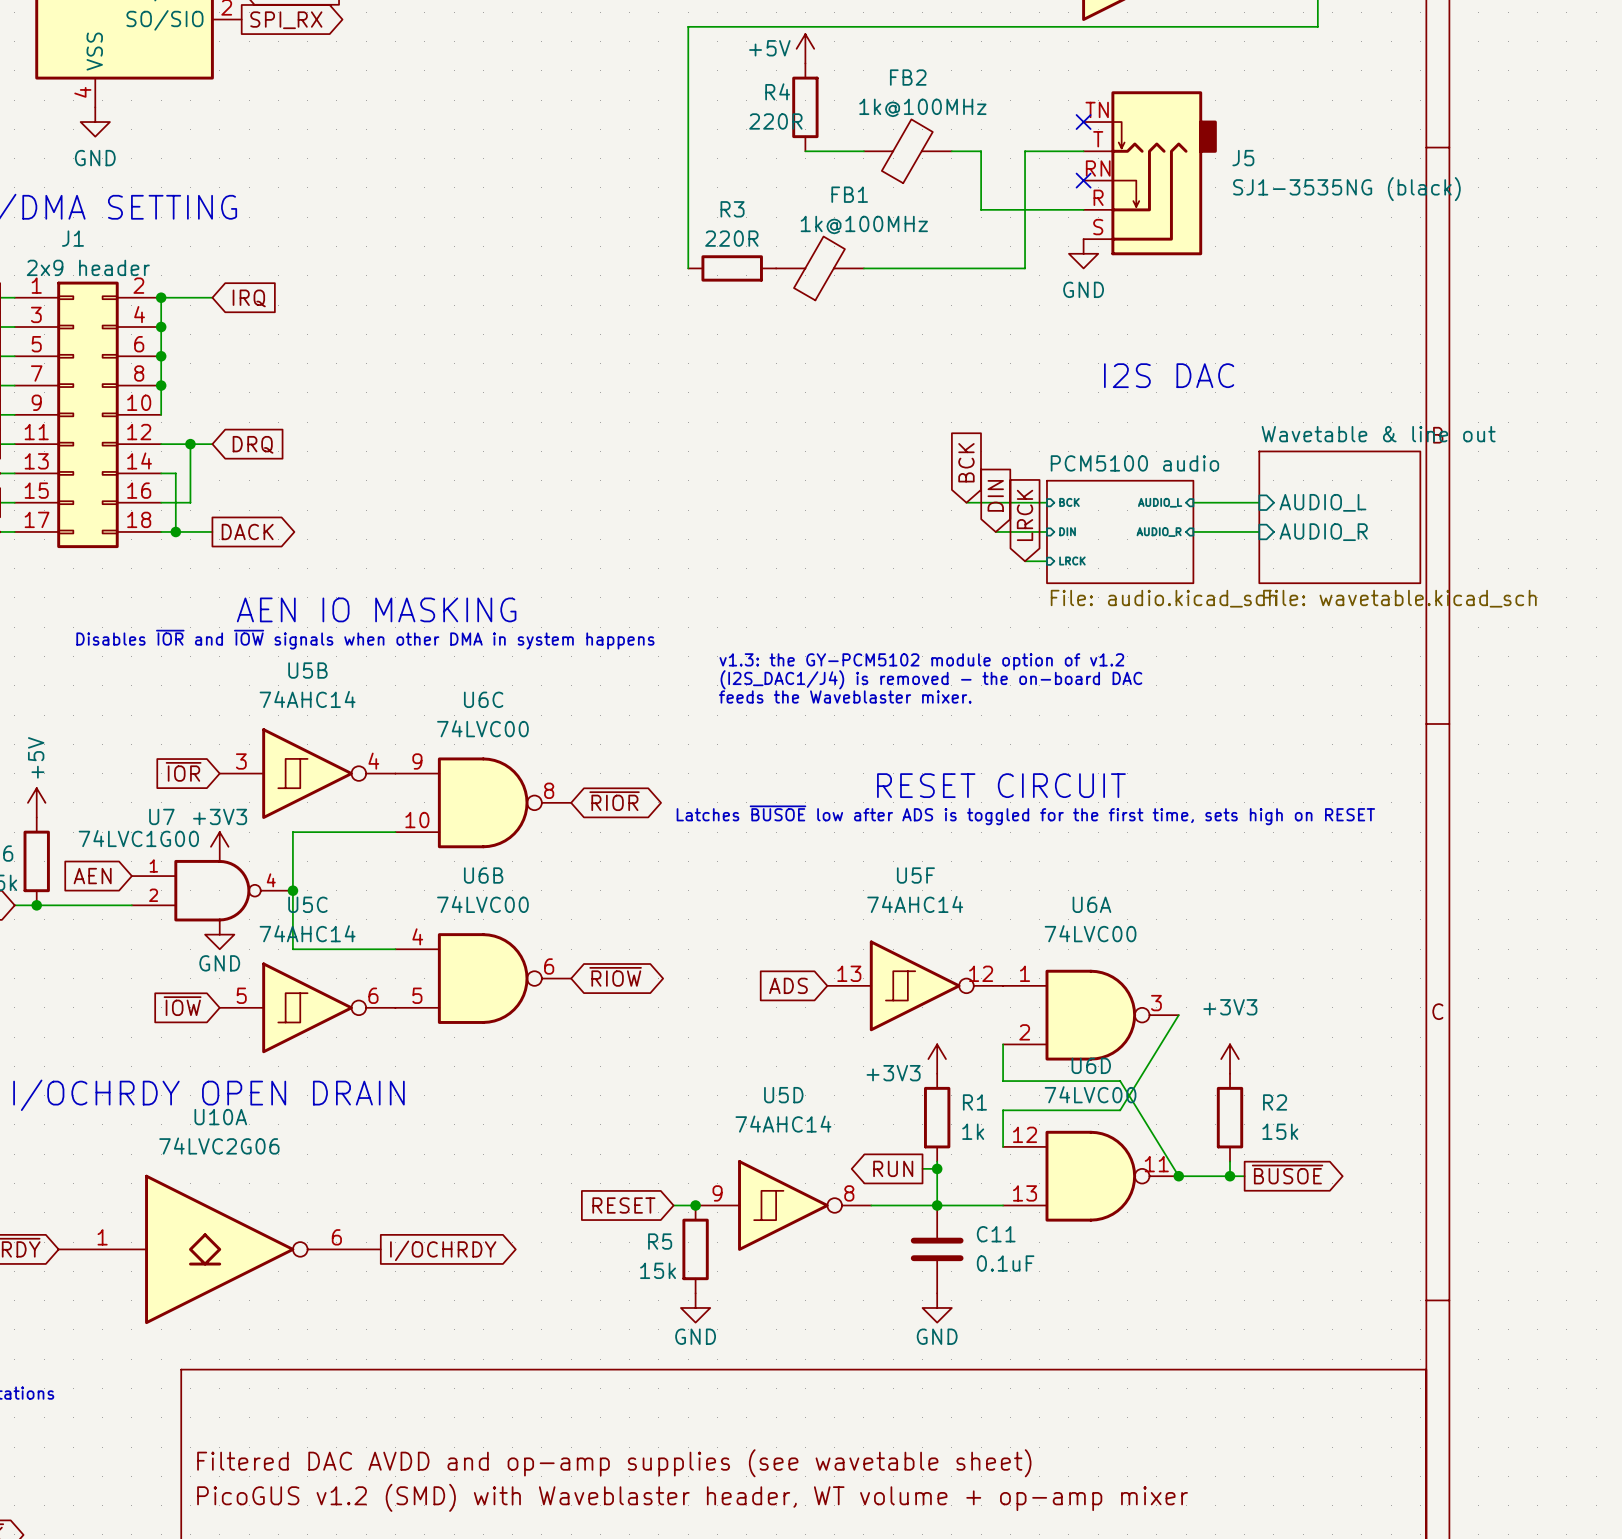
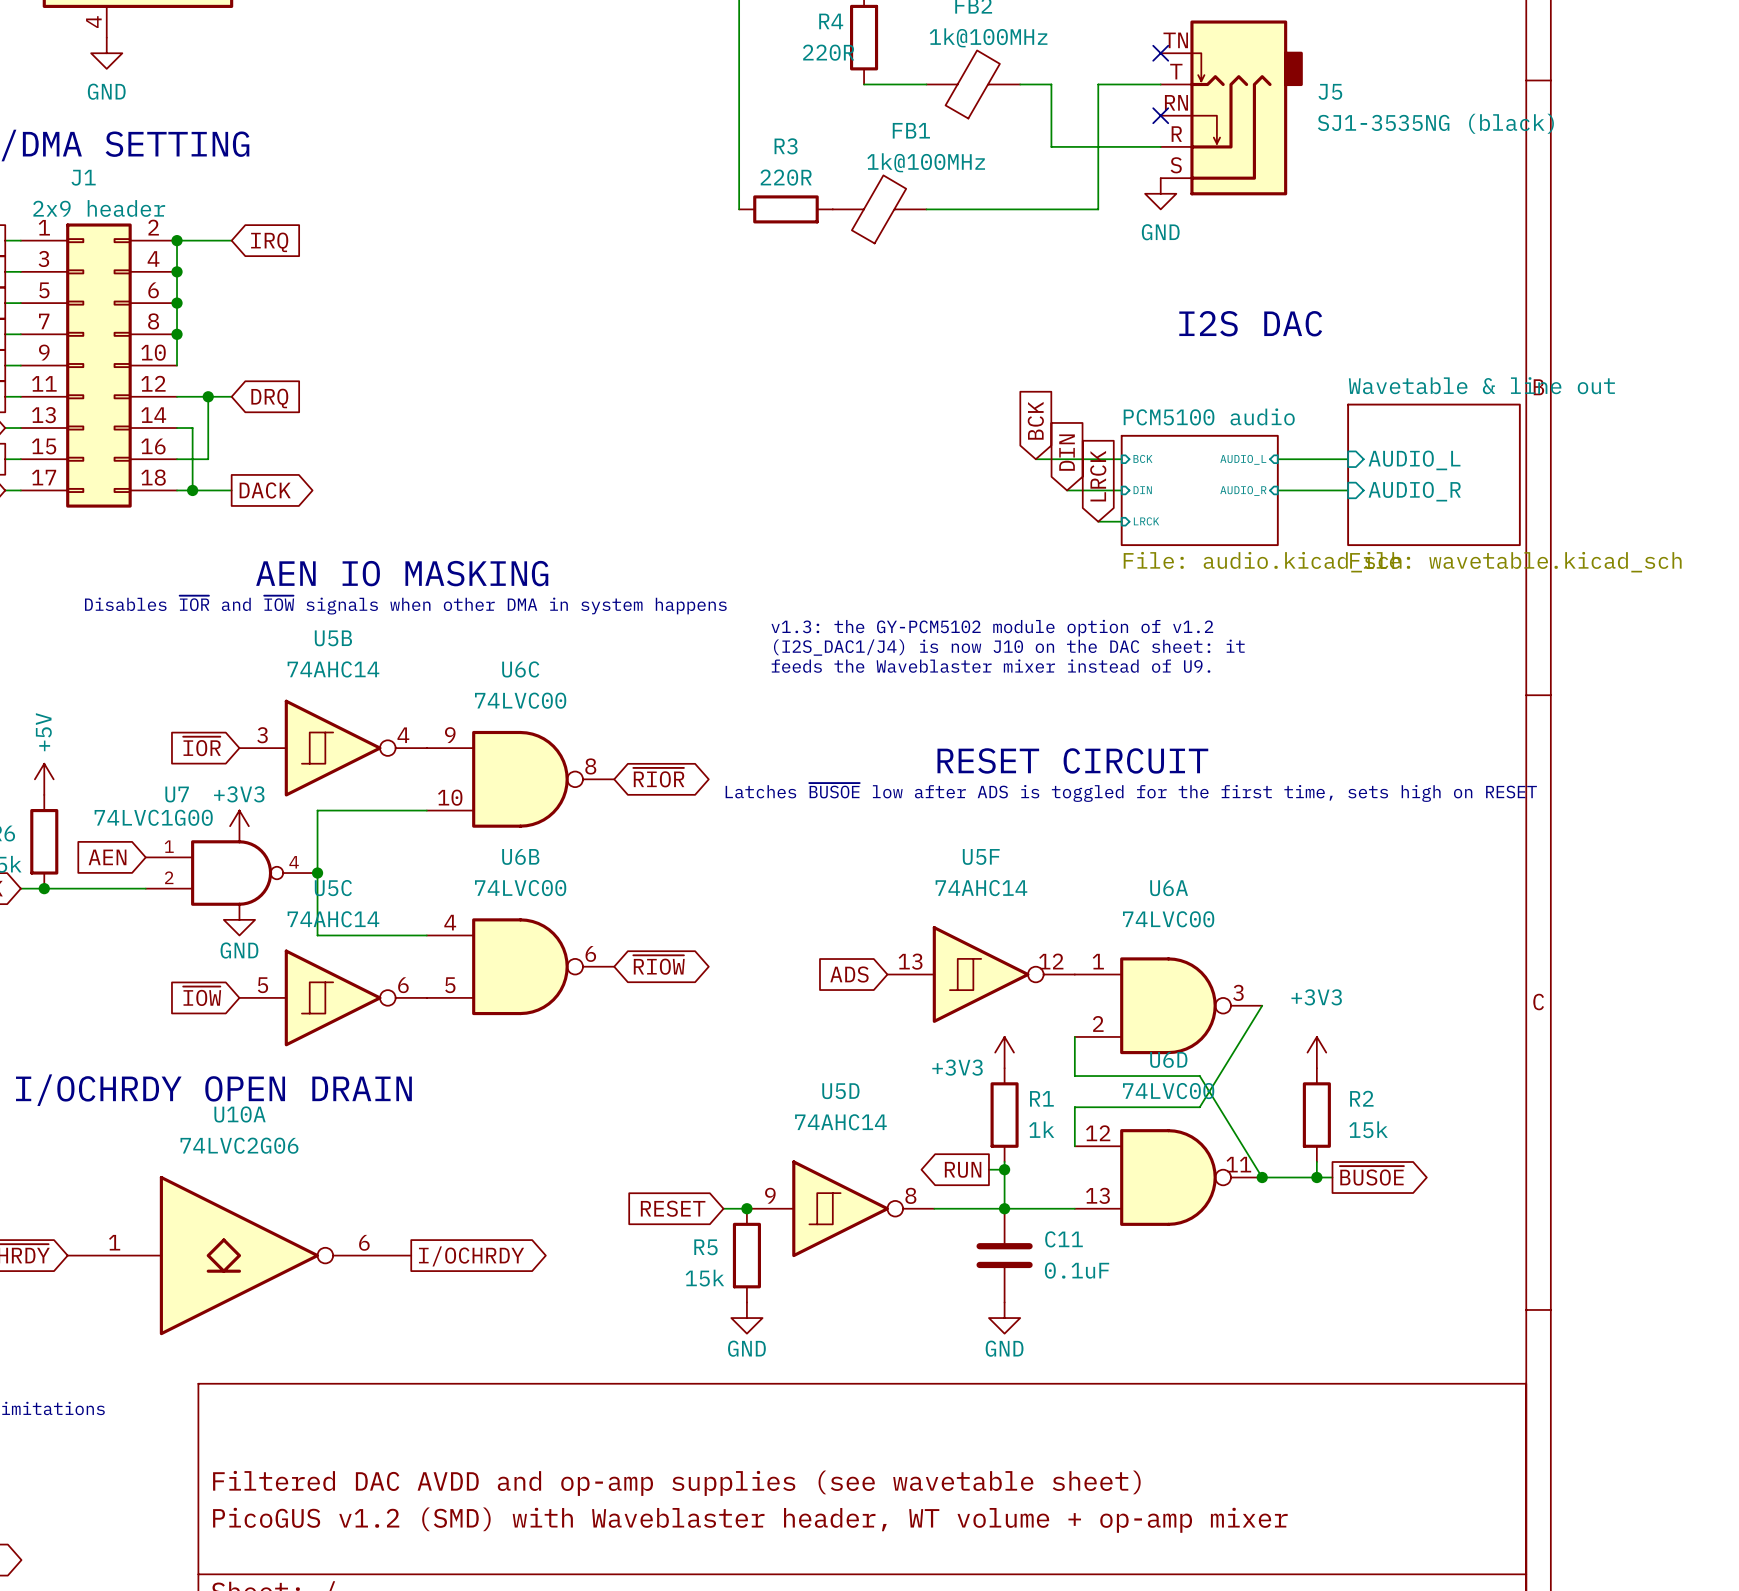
text: (I2S_DAC1/J4) is removed - the on-board DAC (931, 679) -> (I2S_DAC1/J4) is now J10 on the DAC sheet: it (1009, 647)
text: feeds the Waveblaster mixer. (845, 696) -> feeds the Waveblaster mixer instead of U9. (990, 666)

